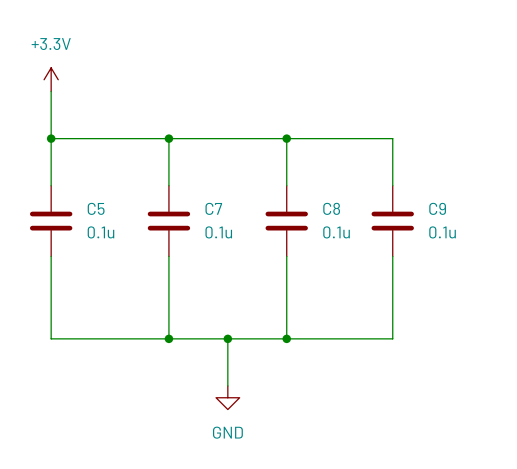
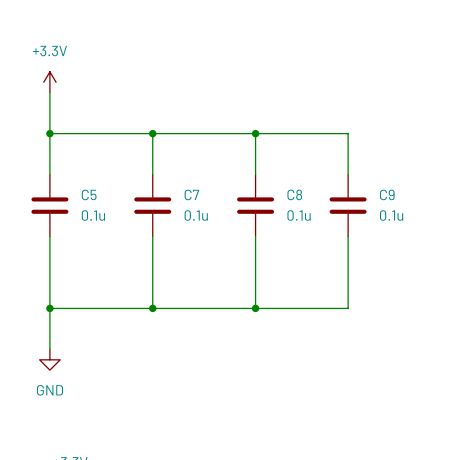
junction: none -> (49, 308)
wire: (227, 338) (227, 385) -> (49, 308) (49, 349)
junction: (227, 338) -> none
power symbol position: GND (227, 397) -> GND (49, 359)

